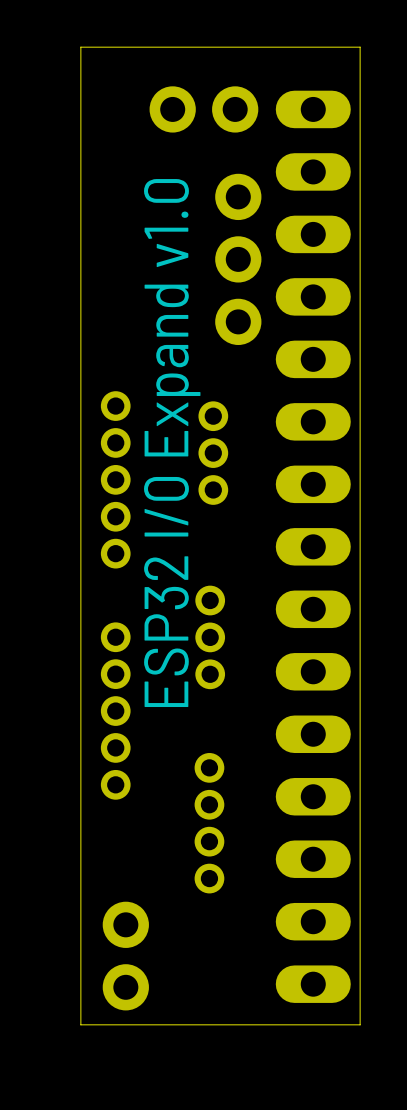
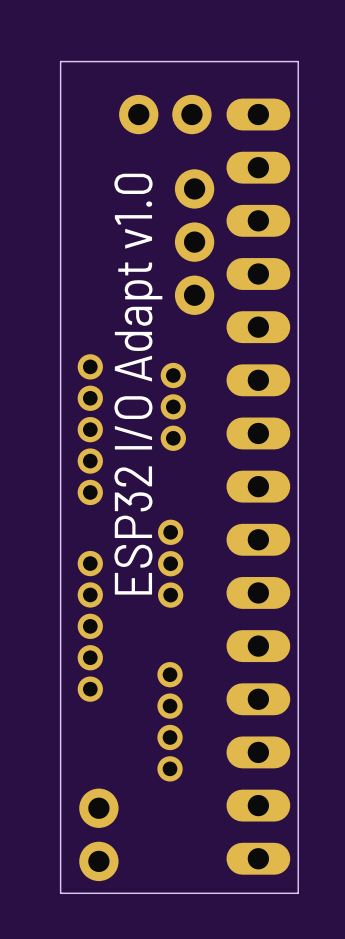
text: ESP32 I/0 Expand v1.0 (172, 443) -> ESP32 I/O Adapt v1.0 (138, 384)

